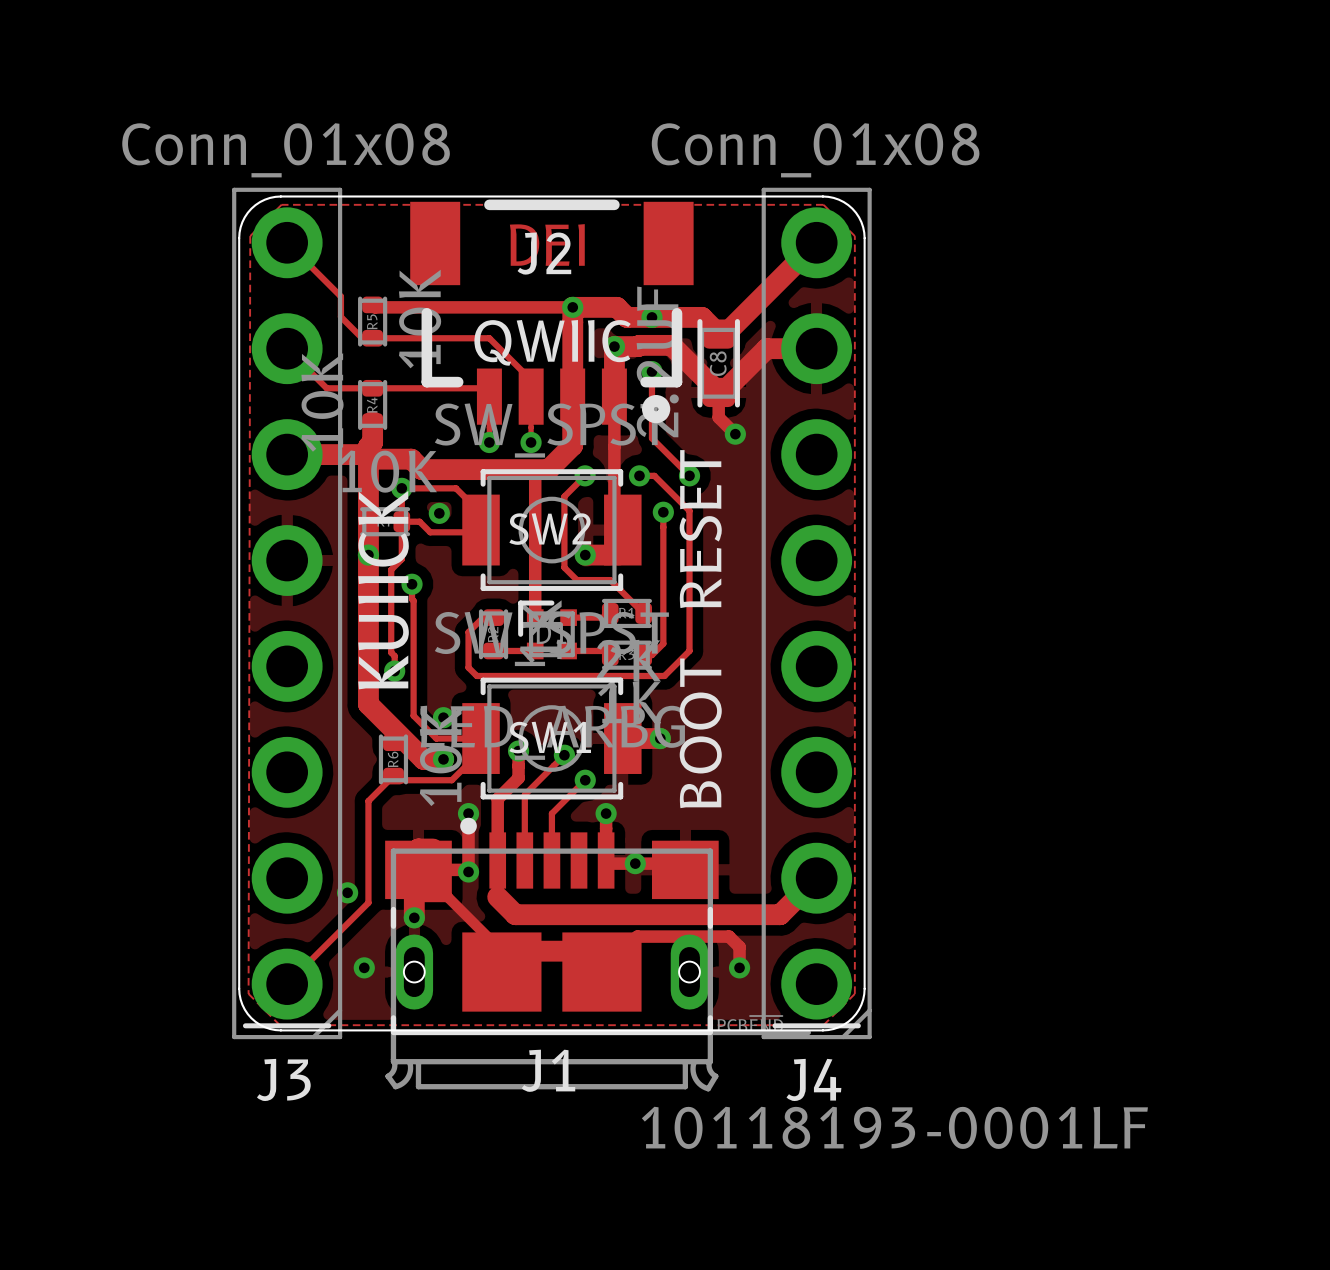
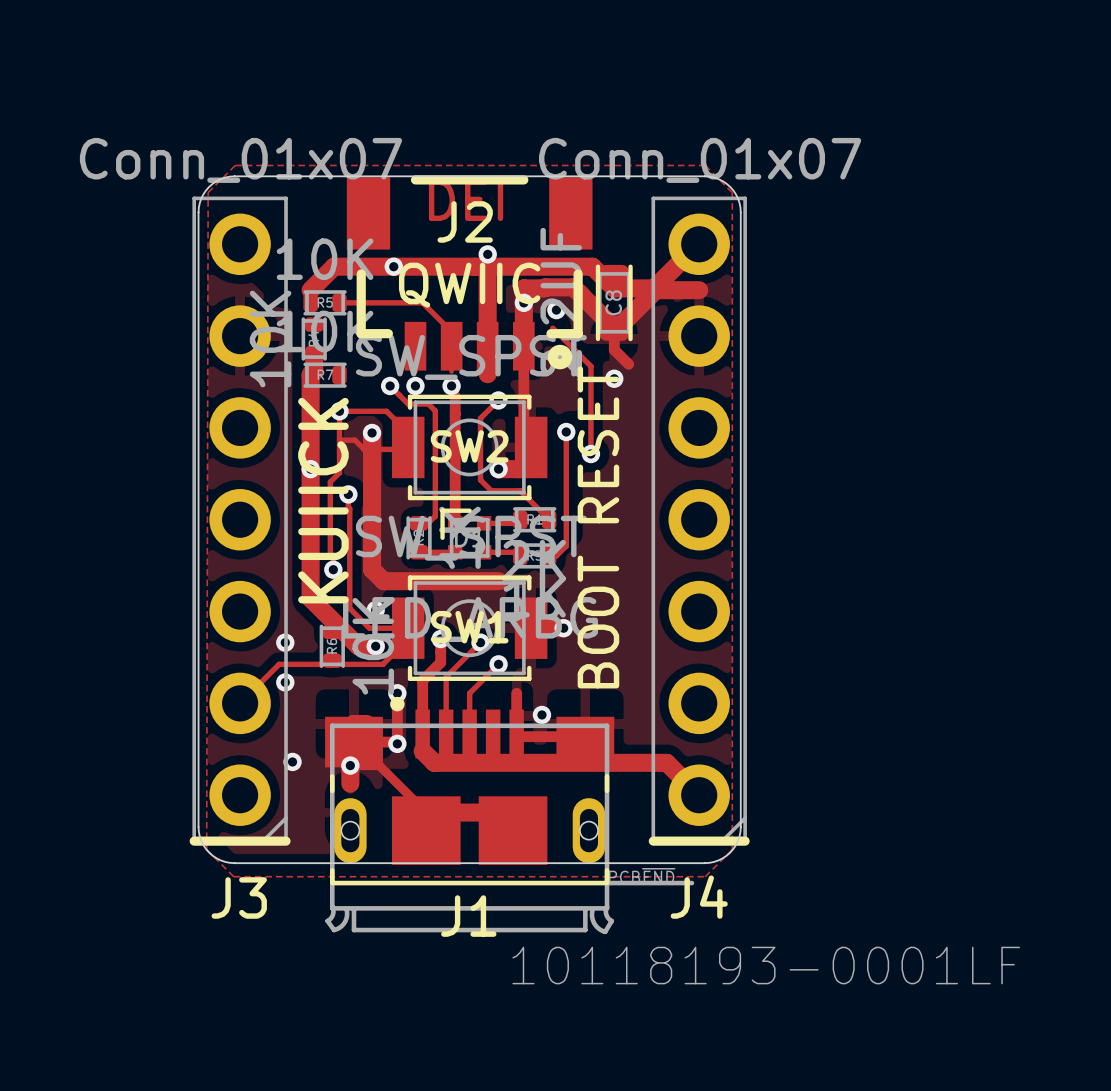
J3 value: Conn_01x08 (286, 150) -> Conn_01x07 (240, 160)
J4 value: Conn_01x08 (815, 150) -> Conn_01x07 (700, 160)
J3 footprint: [232, 187, 343, 1040] -> [189, 196, 291, 846]
J4 footprint: [761, 187, 872, 1040] -> [648, 196, 750, 846]
track: (287, 242) (340, 296) (340, 316) (362, 338) (489, 338) (531, 380) (531, 396) -> (339, 302) (422, 302) (451, 331)
track: (816, 242) (725, 334) (718, 334) -> none
board edge: (239, 259) (239, 232) (244, 217) (260, 202) (280, 196) (828, 196) (848, 205) (859, 217) (864, 232) (864, 259) -> (198, 212) (201, 198) (209, 186) (220, 179) (234, 176) (709, 176) (722, 181) (733, 190) (739, 203) (740, 212)
track: none -> (699, 244) (654, 288) (614, 288) (592, 266) (334, 266) (310, 290)
track: (372, 304) (375, 307) (572, 307) -> none
track: (572, 307) (616, 307) (626, 317) (702, 317) (718, 334) -> none
J2 position: (551, 312) -> (469, 272)
via: (651, 317) -> none
R5 rotation: 0° (372, 321) -> 90° clockwise (325, 302)
R5 position: (372, 321) -> (325, 302)
via: none -> (393, 266)
via position: (614, 346) -> (523, 302)
track: (287, 348) (326, 388) (481, 388) (489, 396) (489, 384) -> none
track: (651, 371) (651, 438) (689, 475) -> none
track: none -> (552, 328) (590, 366) (590, 454)
via position: (735, 434) -> (614, 378)
via position: (489, 442) -> (415, 385)
via position: (531, 442) -> (451, 385)
track: (572, 445) (548, 469) (421, 469) (411, 459) (368, 459) (363, 454) (287, 454) -> none
via: none -> (390, 385)
track: (639, 475) (654, 475) (689, 510) (689, 650) (664, 675) (476, 675) (468, 667) (468, 632) (483, 617) (493, 617) -> (390, 385) (408, 404) (428, 404) (435, 410) (435, 516) (428, 523) (419, 523)
via: (639, 475) -> none
via: (689, 475) -> none
track: none -> (372, 432) (372, 569) (383, 581) (498, 581)
R7 position: (385, 521) -> (325, 375)
via: none -> (590, 454)
via: none -> (285, 642)
track: (393, 776) (368, 801) (368, 902) (287, 984) -> none
track: none -> (335, 664) (279, 664) (240, 703)
via: none -> (285, 682)
via: (606, 813) -> none
via: none -> (541, 714)
via: (635, 863) -> none
track: (816, 878) (780, 914) (515, 914) (497, 896) (497, 880) -> (698, 795) (666, 762) (434, 762) (422, 751)
via position: (414, 917) -> (350, 765)
board edge: (239, 967) (239, 994) (244, 1009) (260, 1024) (280, 1030) (828, 1030) (848, 1021) (859, 1009) (864, 994) (864, 967) -> (198, 827) (201, 840) (209, 852) (220, 860) (234, 863) (709, 862) (722, 858) (733, 849) (739, 836) (740, 827)
via: (364, 967) -> none
track: (739, 967) (739, 947) (729, 936) (637, 936) (601, 972) -> none
via: (739, 967) -> none

